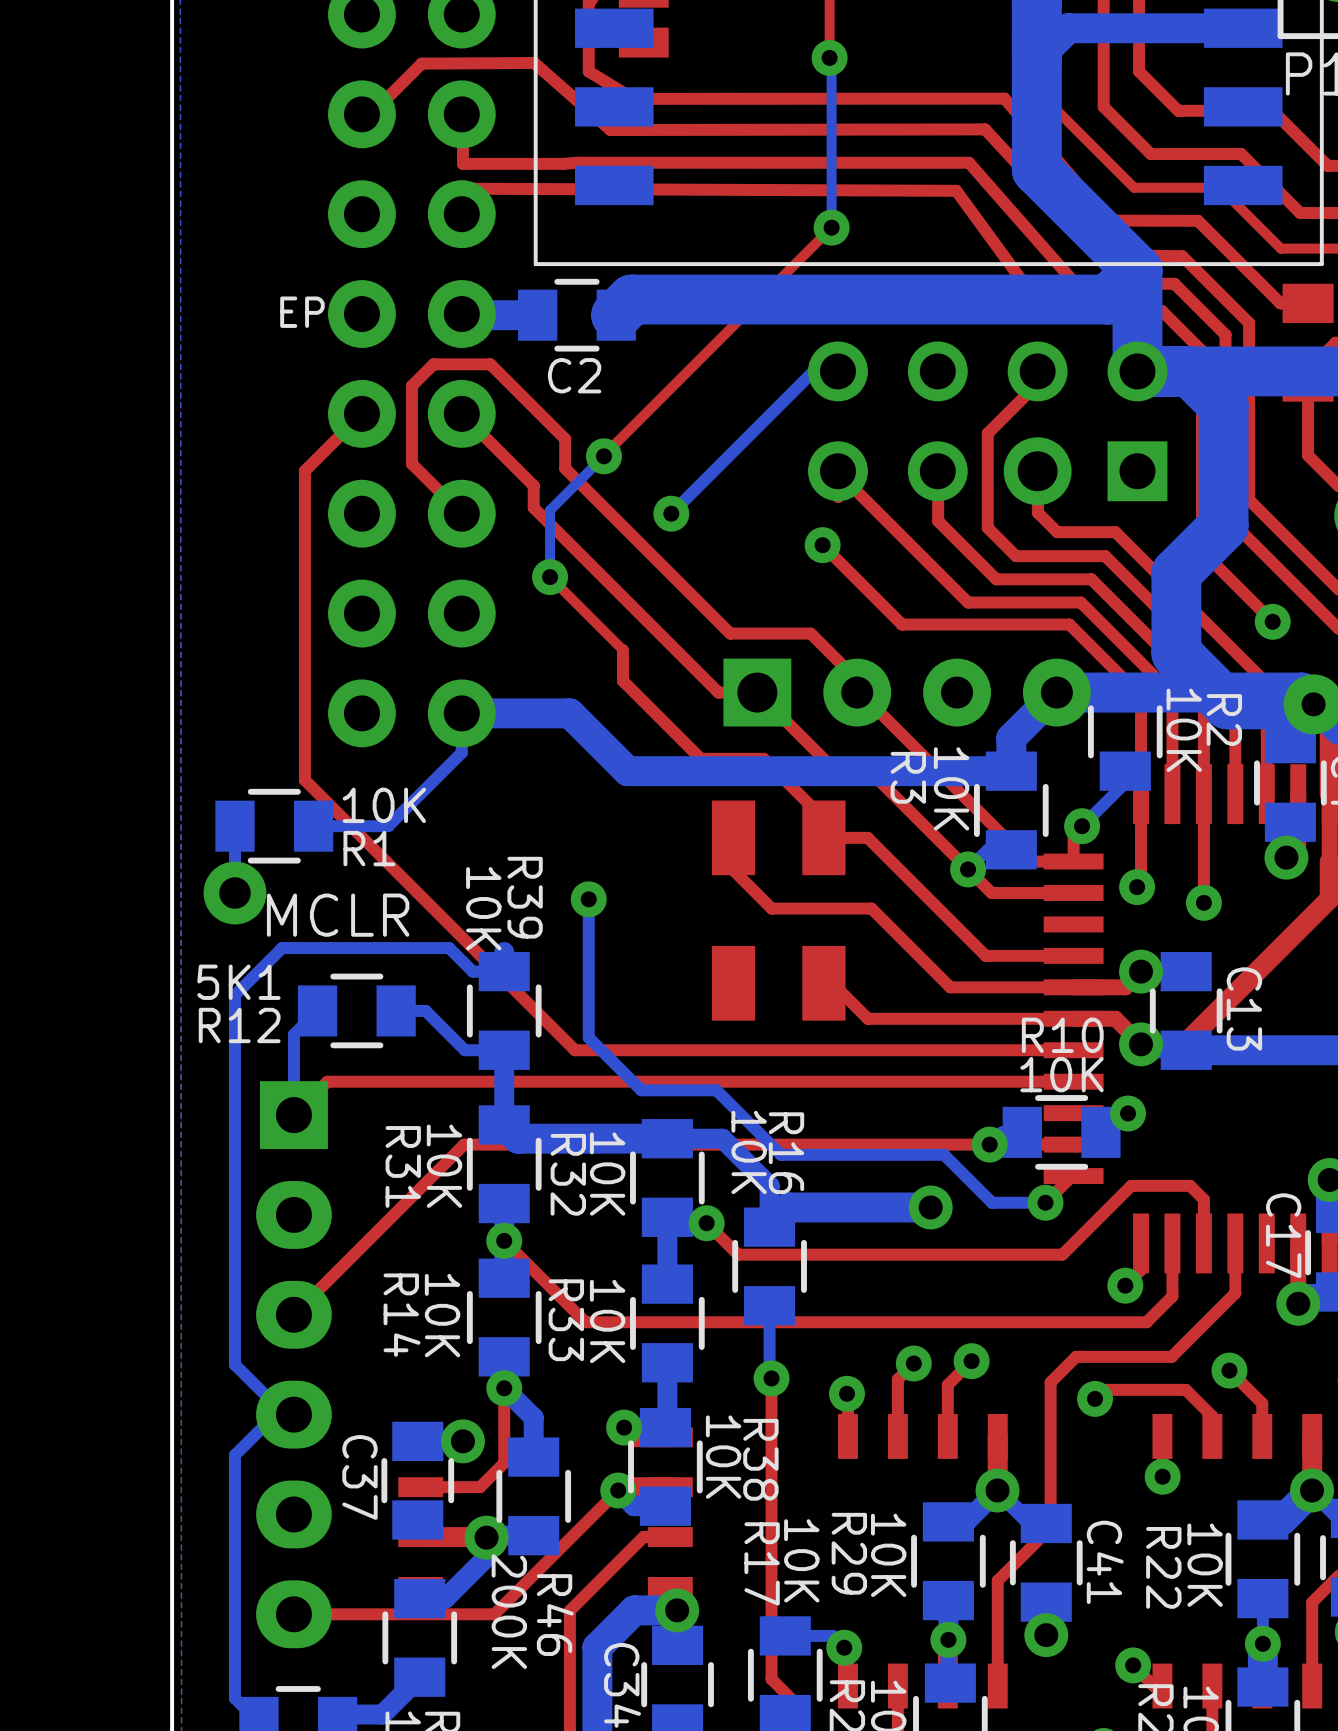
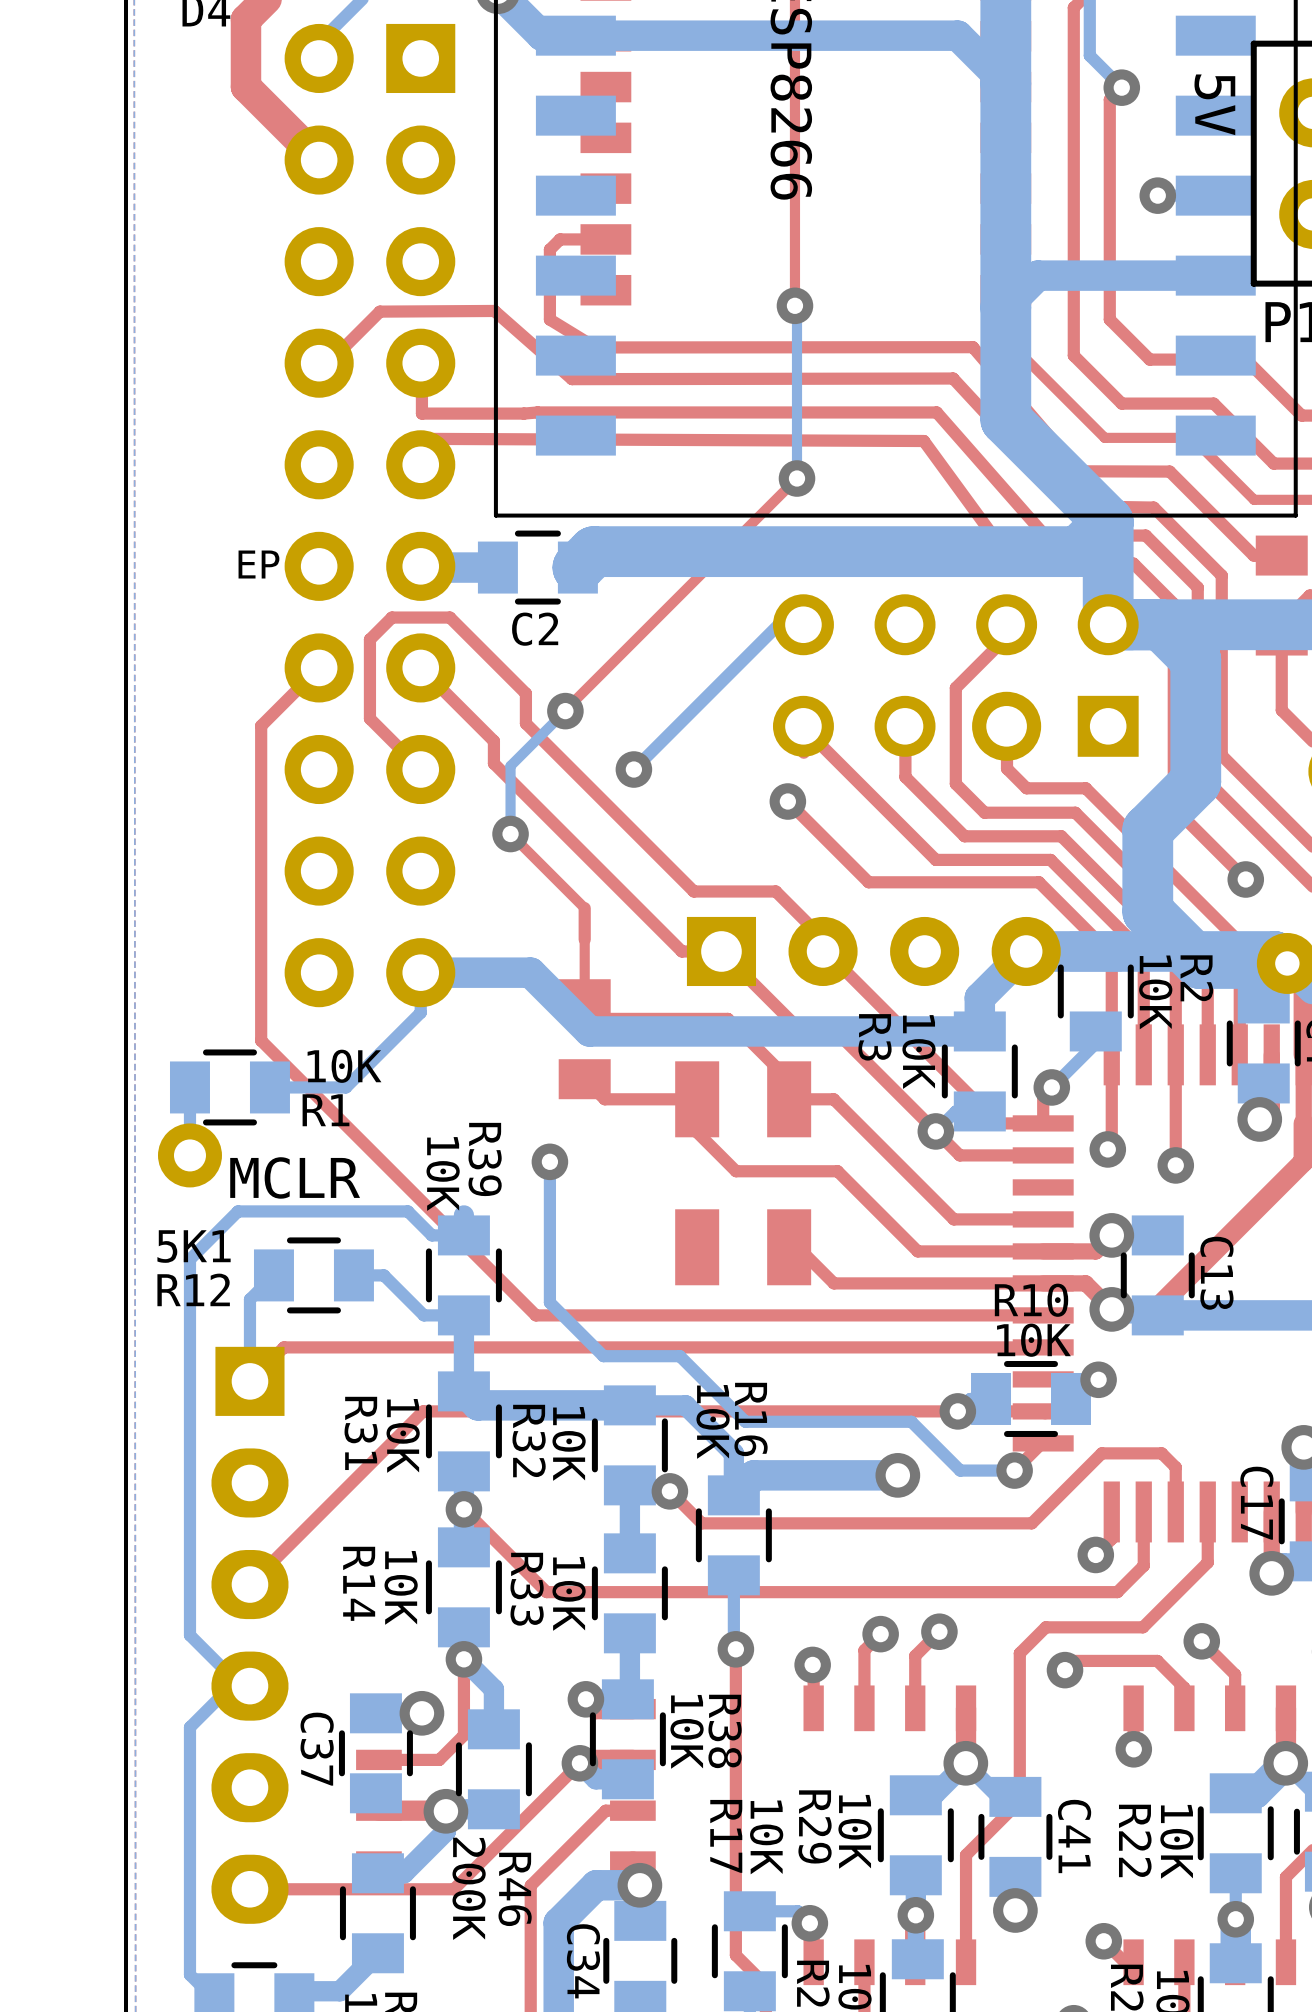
top track: (622, 680) (700, 758) -> (584, 939) (584, 999) (604, 1018) (663, 1018)
part: none -> (584, 1039)
top track: none -> (584, 1079) (604, 1099) (697, 1099)

